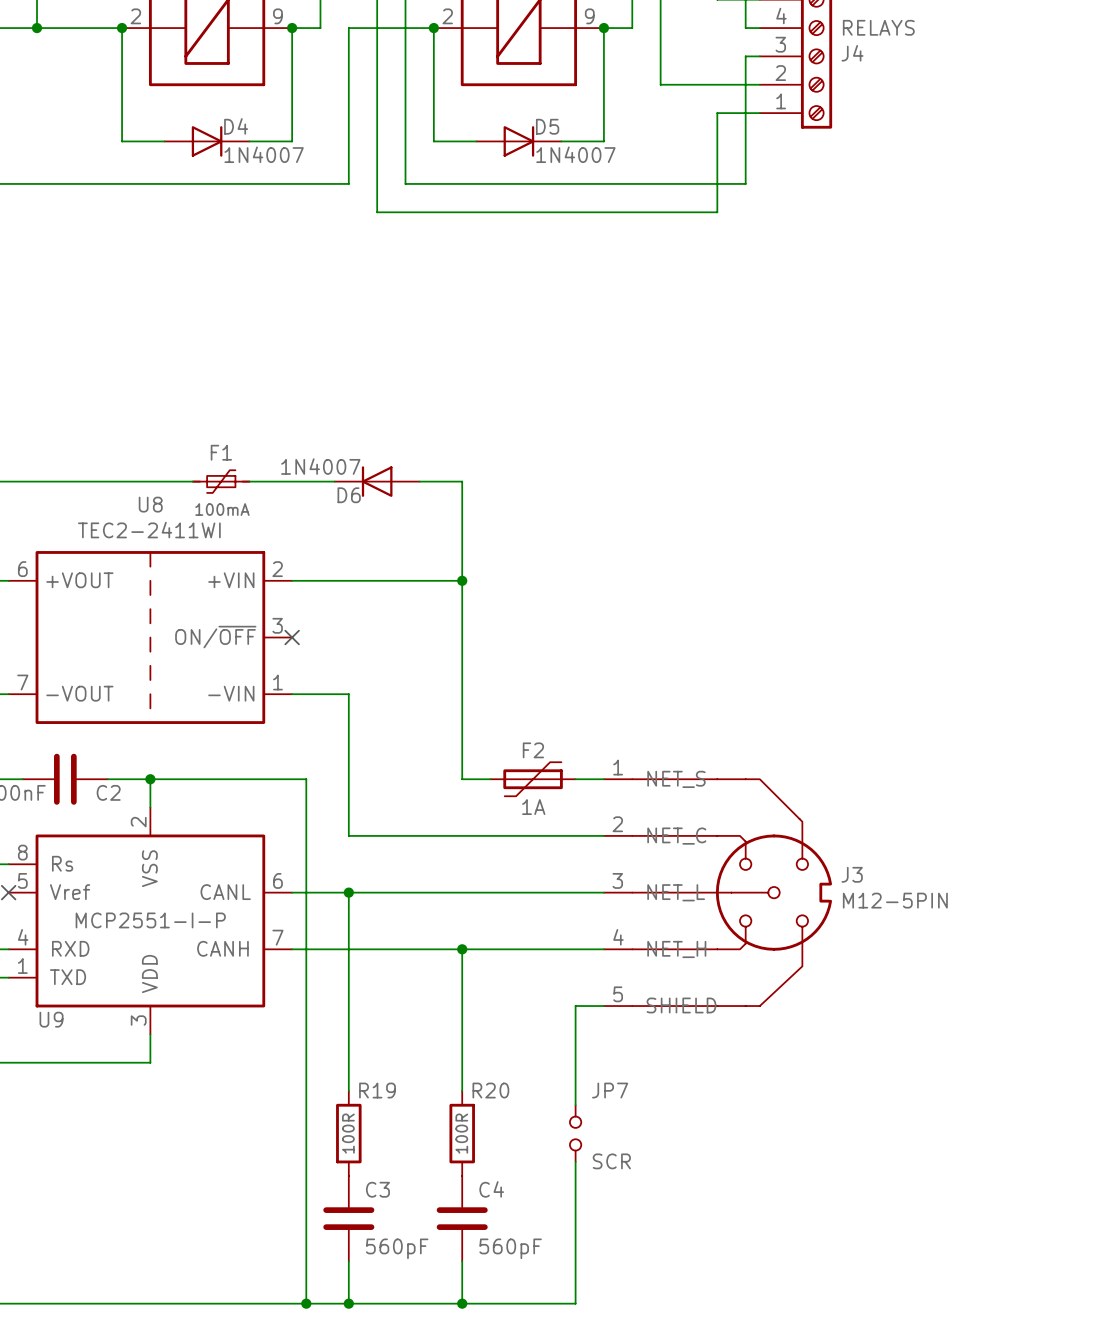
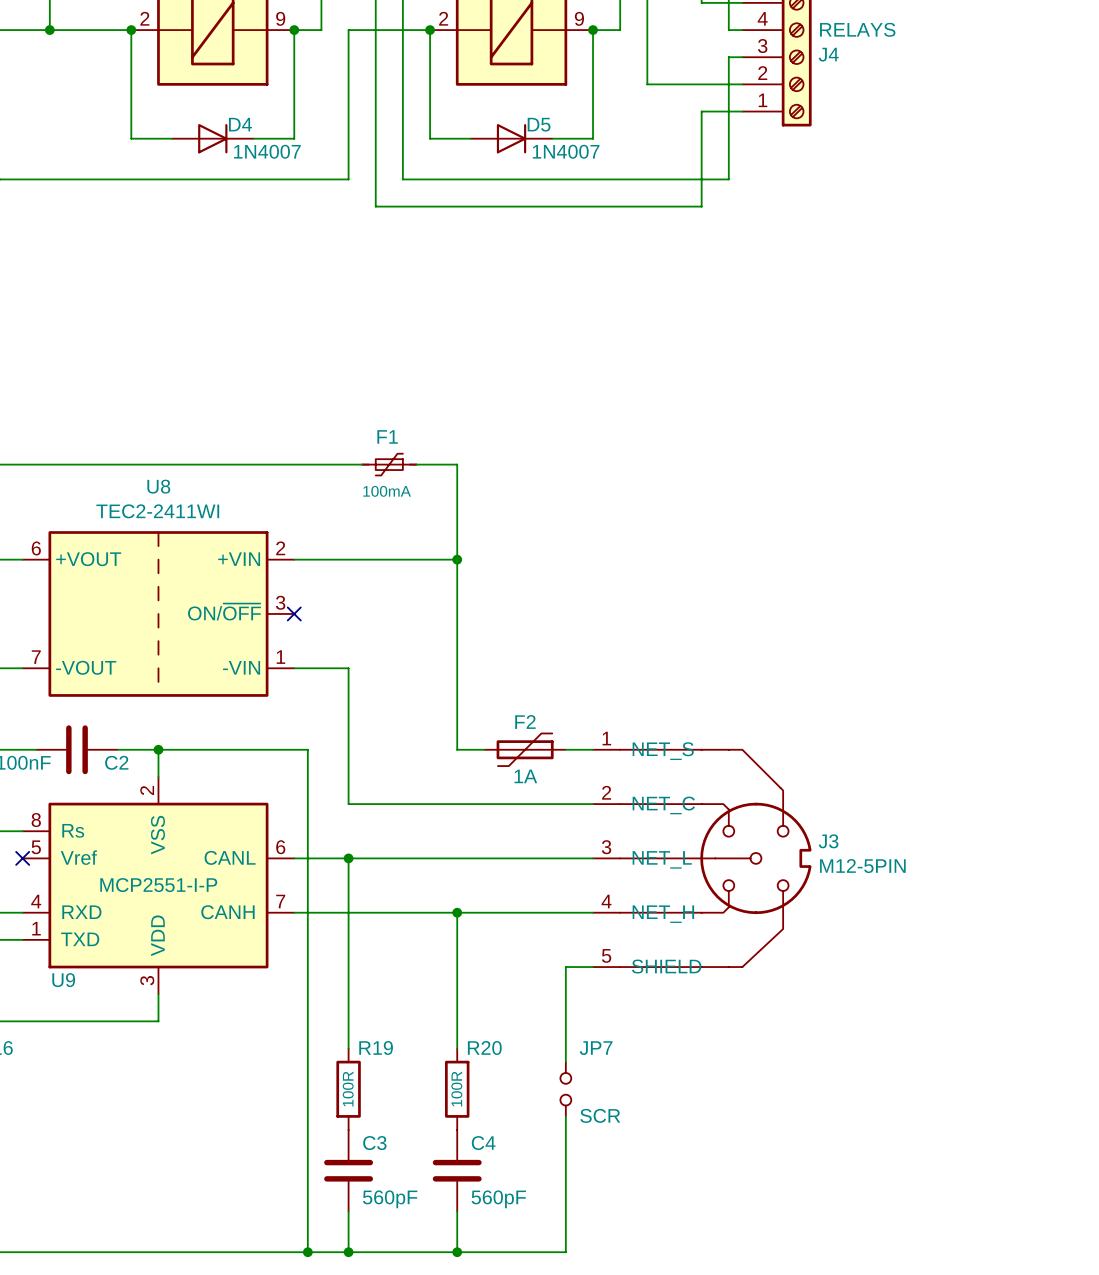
F1 position: (221, 481) -> (389, 464)
D6: 1N4007 (377, 481) -> none

